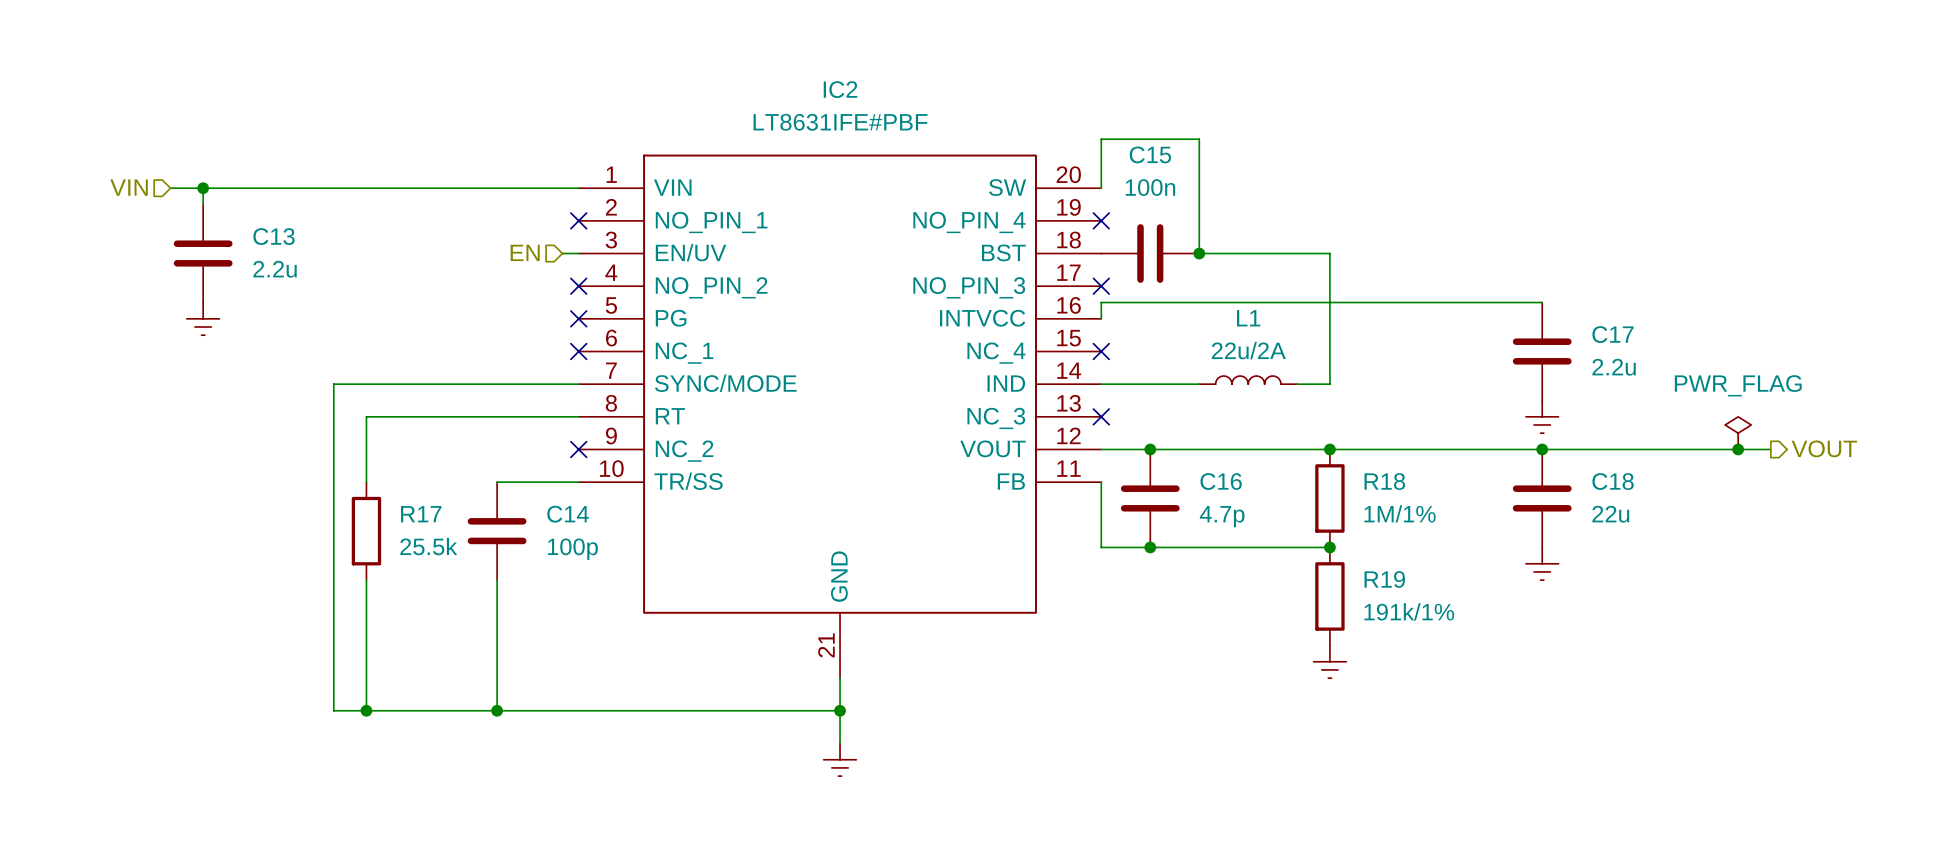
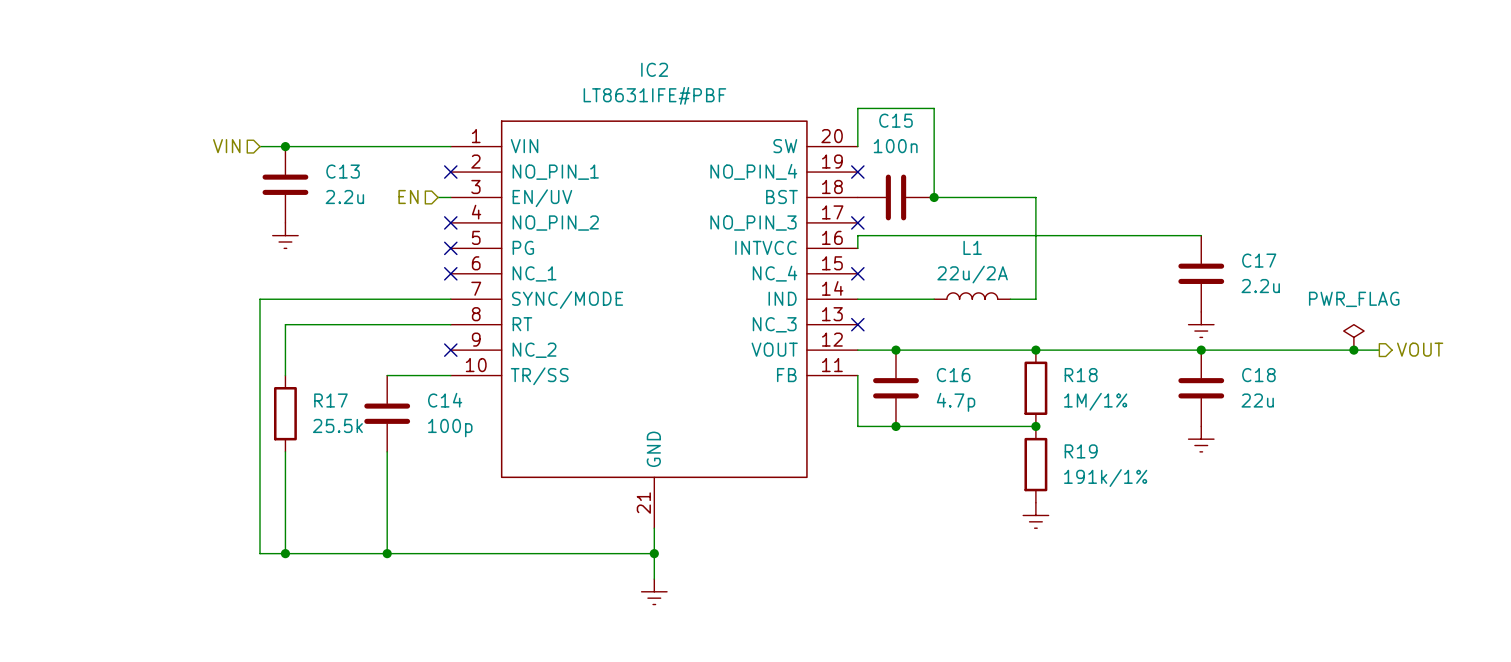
hierarchical label position: VIN (129, 187) -> VIN (226, 146)
wire: (170, 188) (333, 188) -> none
wire: (203, 188) (203, 204) -> none
junction: (203, 188) -> none
junction: none -> (285, 146)
C13 position: (203, 253) -> (285, 184)
power symbol position: (203, 318) -> (285, 235)

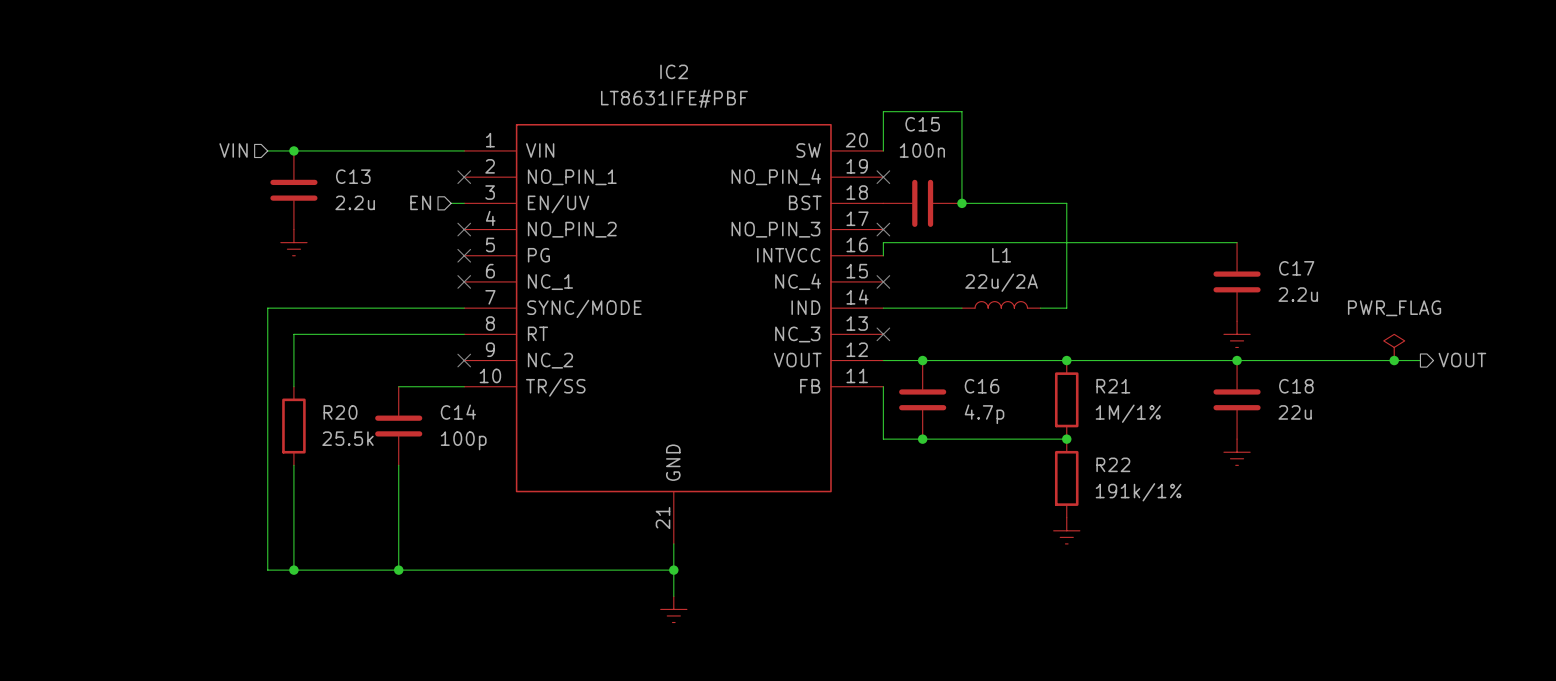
R18 name: R18 (1081, 375) -> R21 (1113, 386)
R17 name: R17 (330, 400) -> R20 (340, 412)
R19 name: R19 (1081, 451) -> R22 (1113, 464)

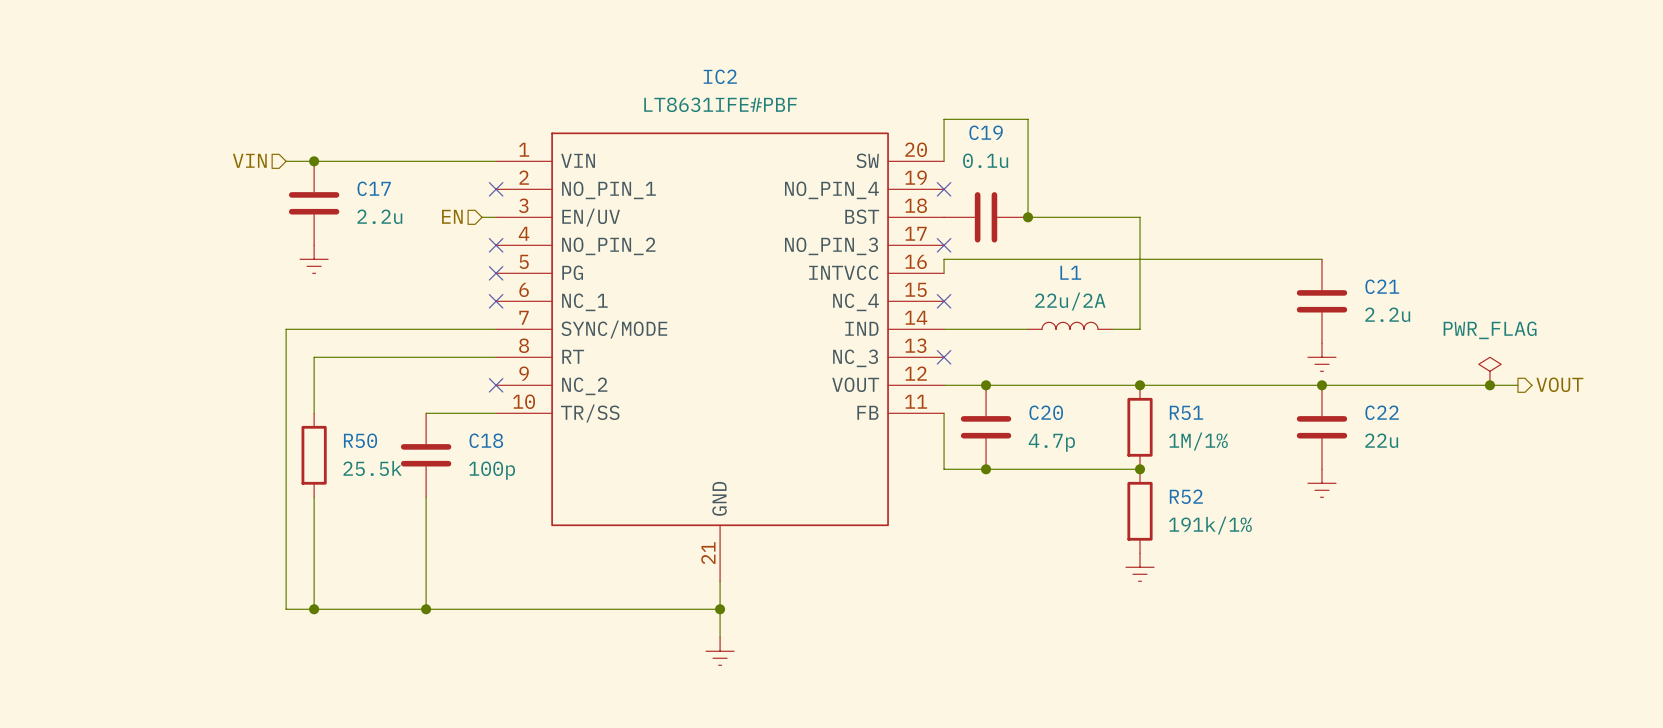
C15 name: C15 (922, 124) -> C19 (986, 132)
C15 value: 100n (922, 150) -> 0.1u (985, 160)
C13 name: C13 (353, 176) -> C17 (374, 188)
C17 name: C17 (1296, 268) -> C21 (1382, 286)
C16 name: C16 (982, 386) -> C20 (1046, 412)
R21 name: R21 (1113, 386) -> R51 (1186, 412)
C18 name: C18 (1296, 386) -> C22 (1382, 412)
R20 name: R20 (340, 412) -> R50 (360, 440)
C14 name: C14 (458, 412) -> C18 (486, 440)
R22 name: R22 (1113, 464) -> R52 (1186, 496)

